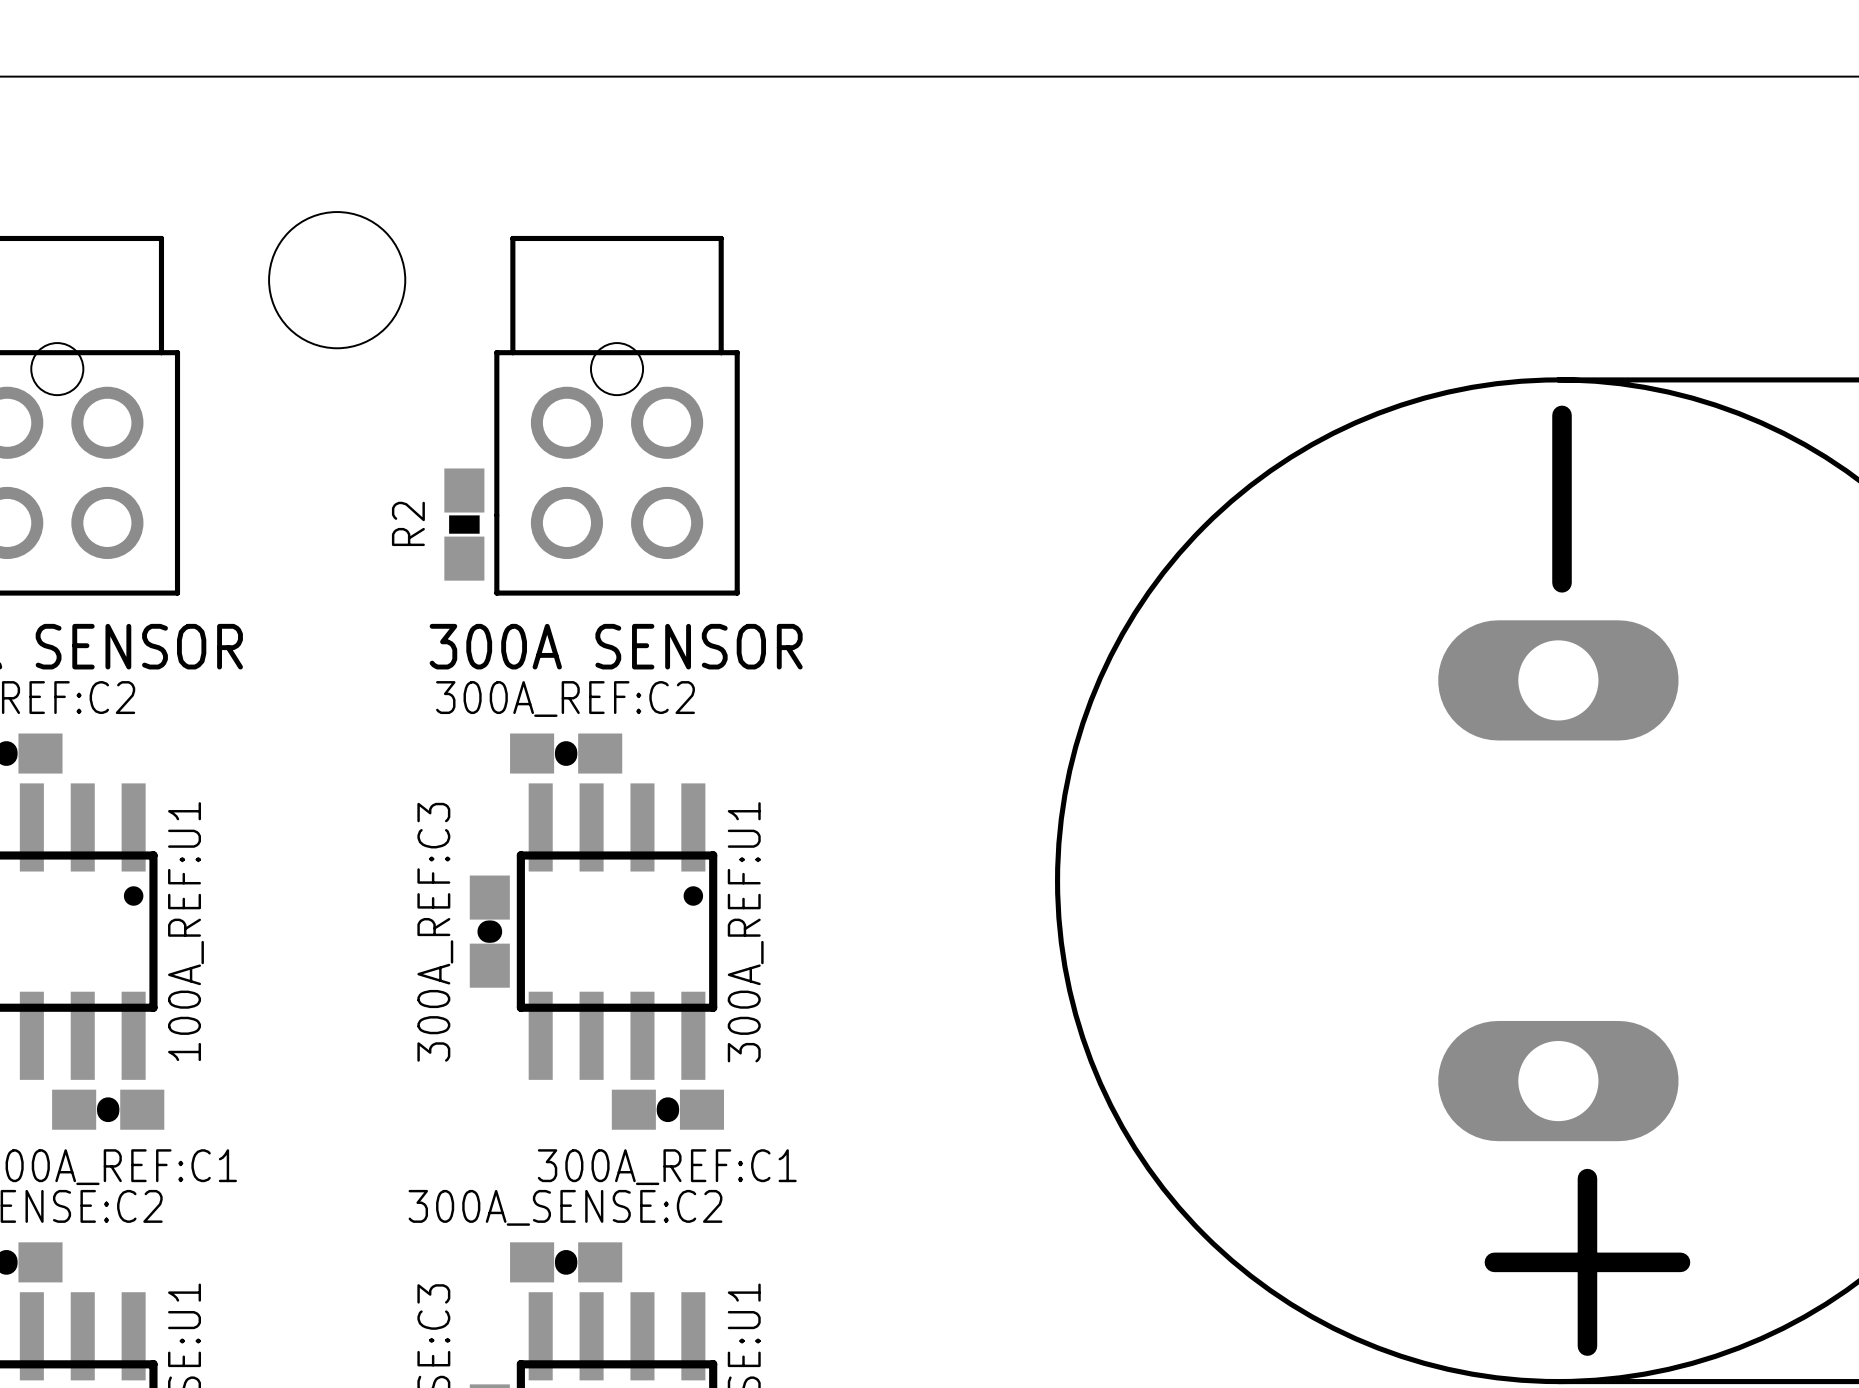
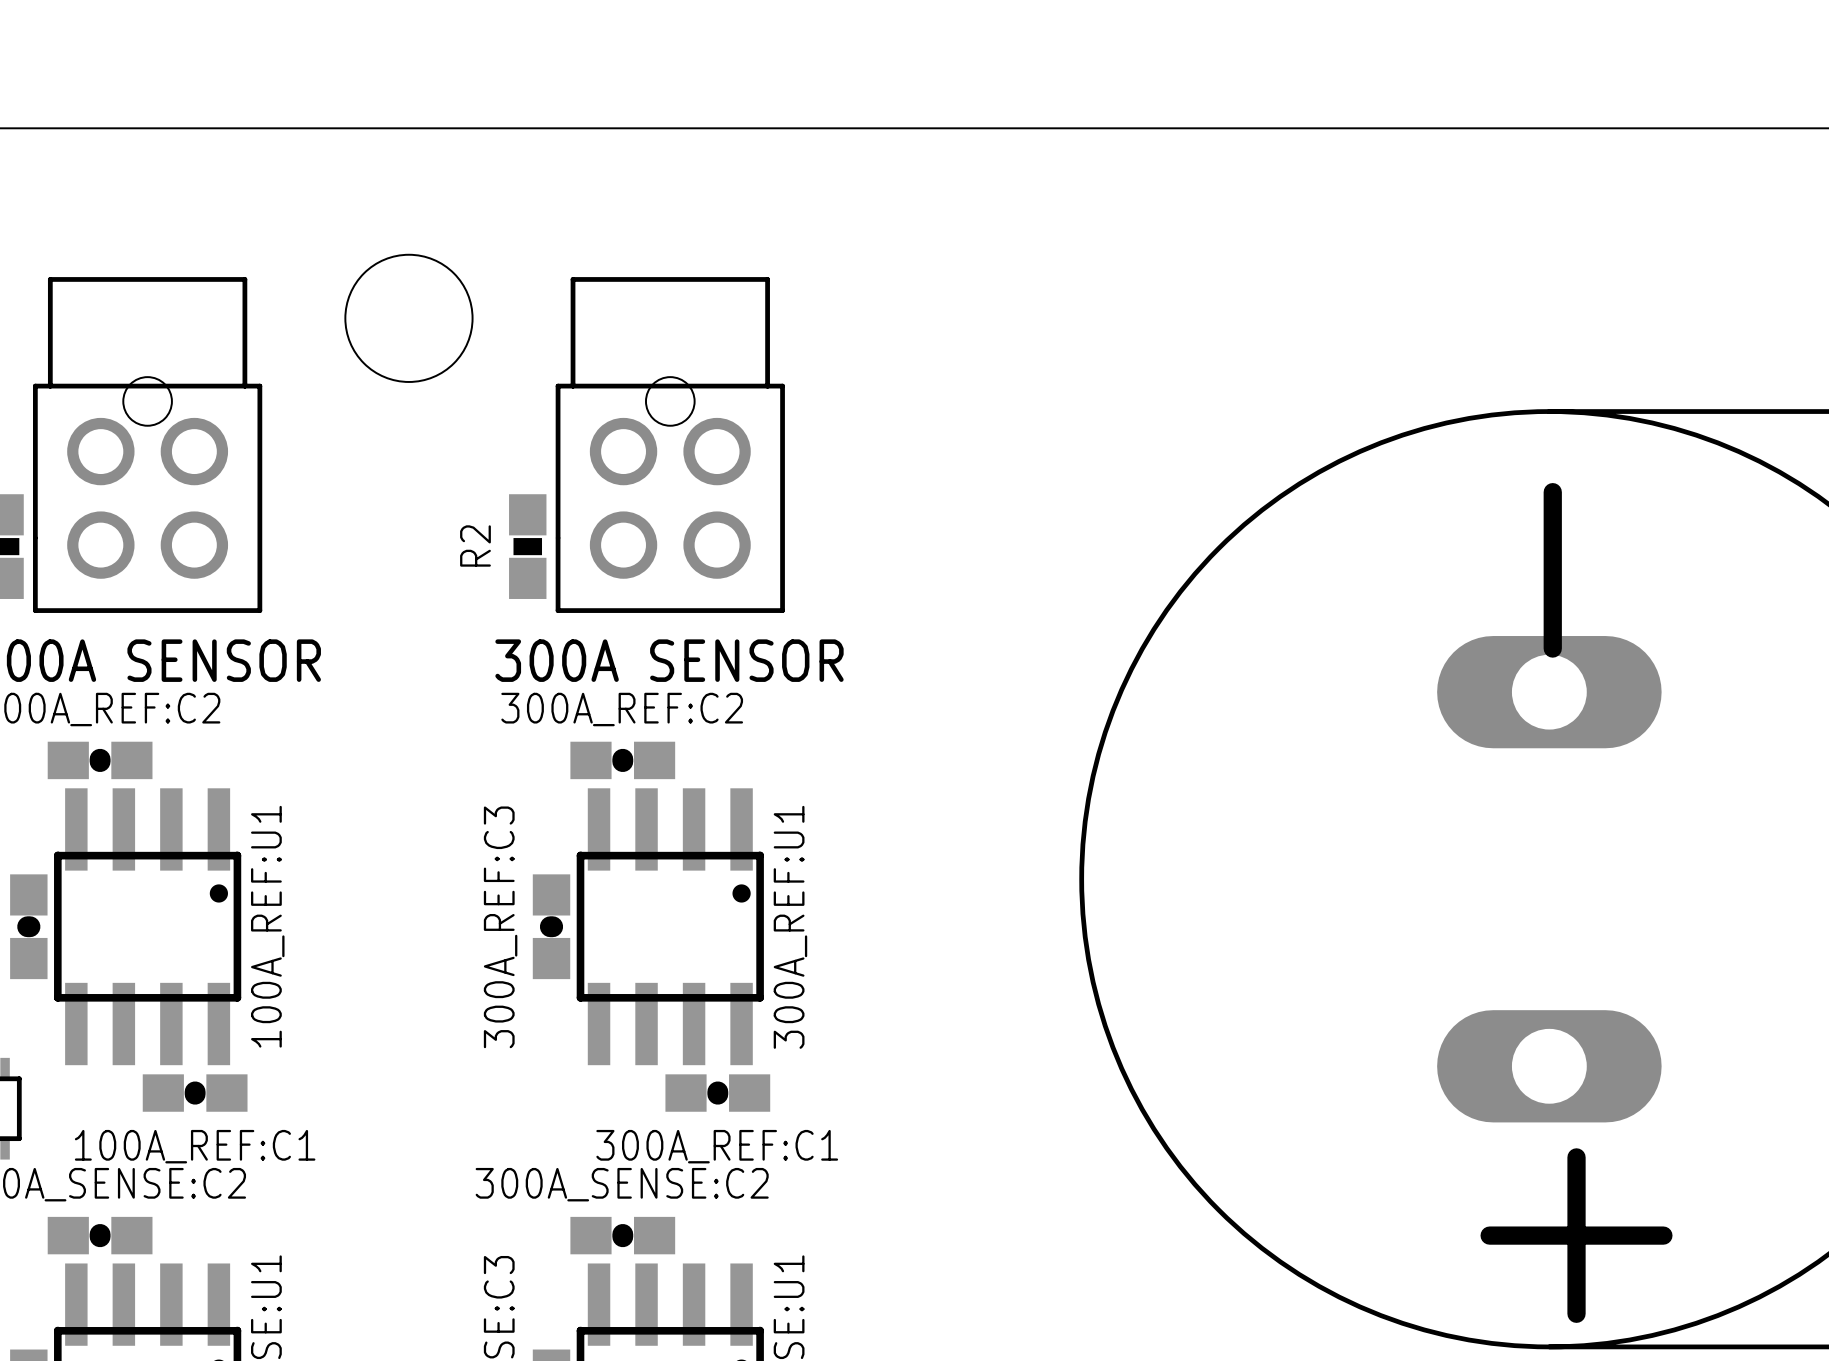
part text position: - (1562, 499) -> - (1552, 570)

